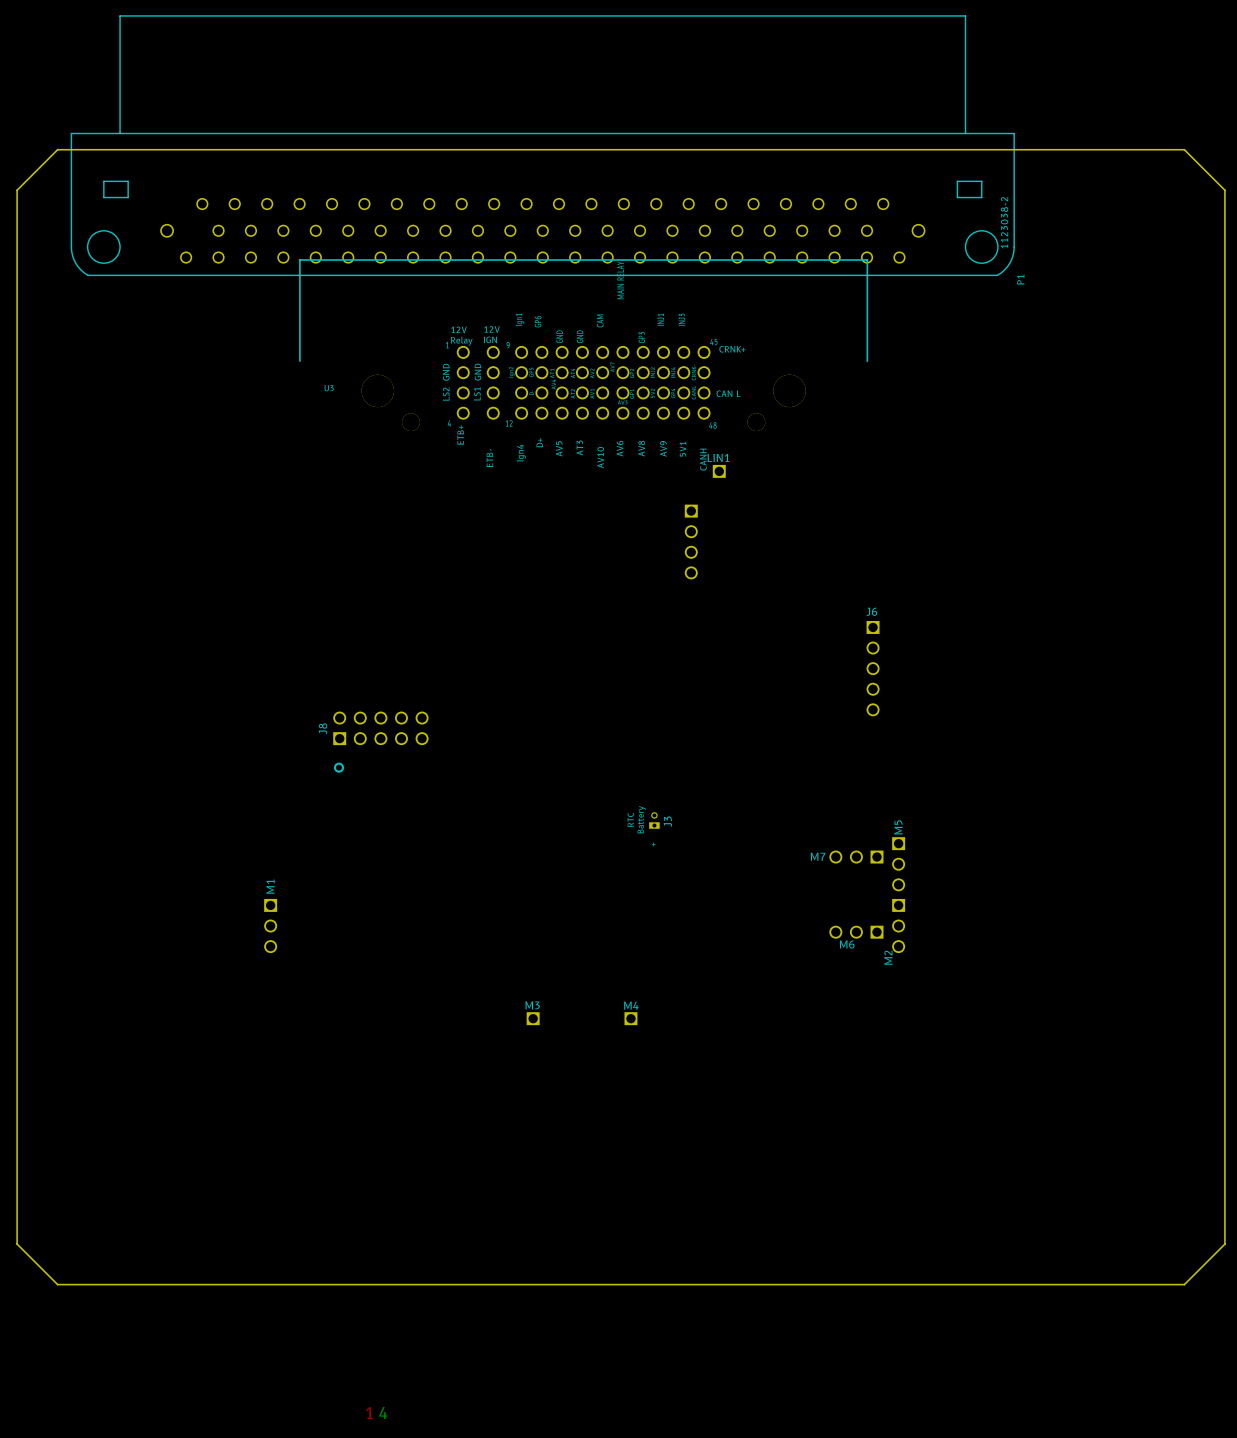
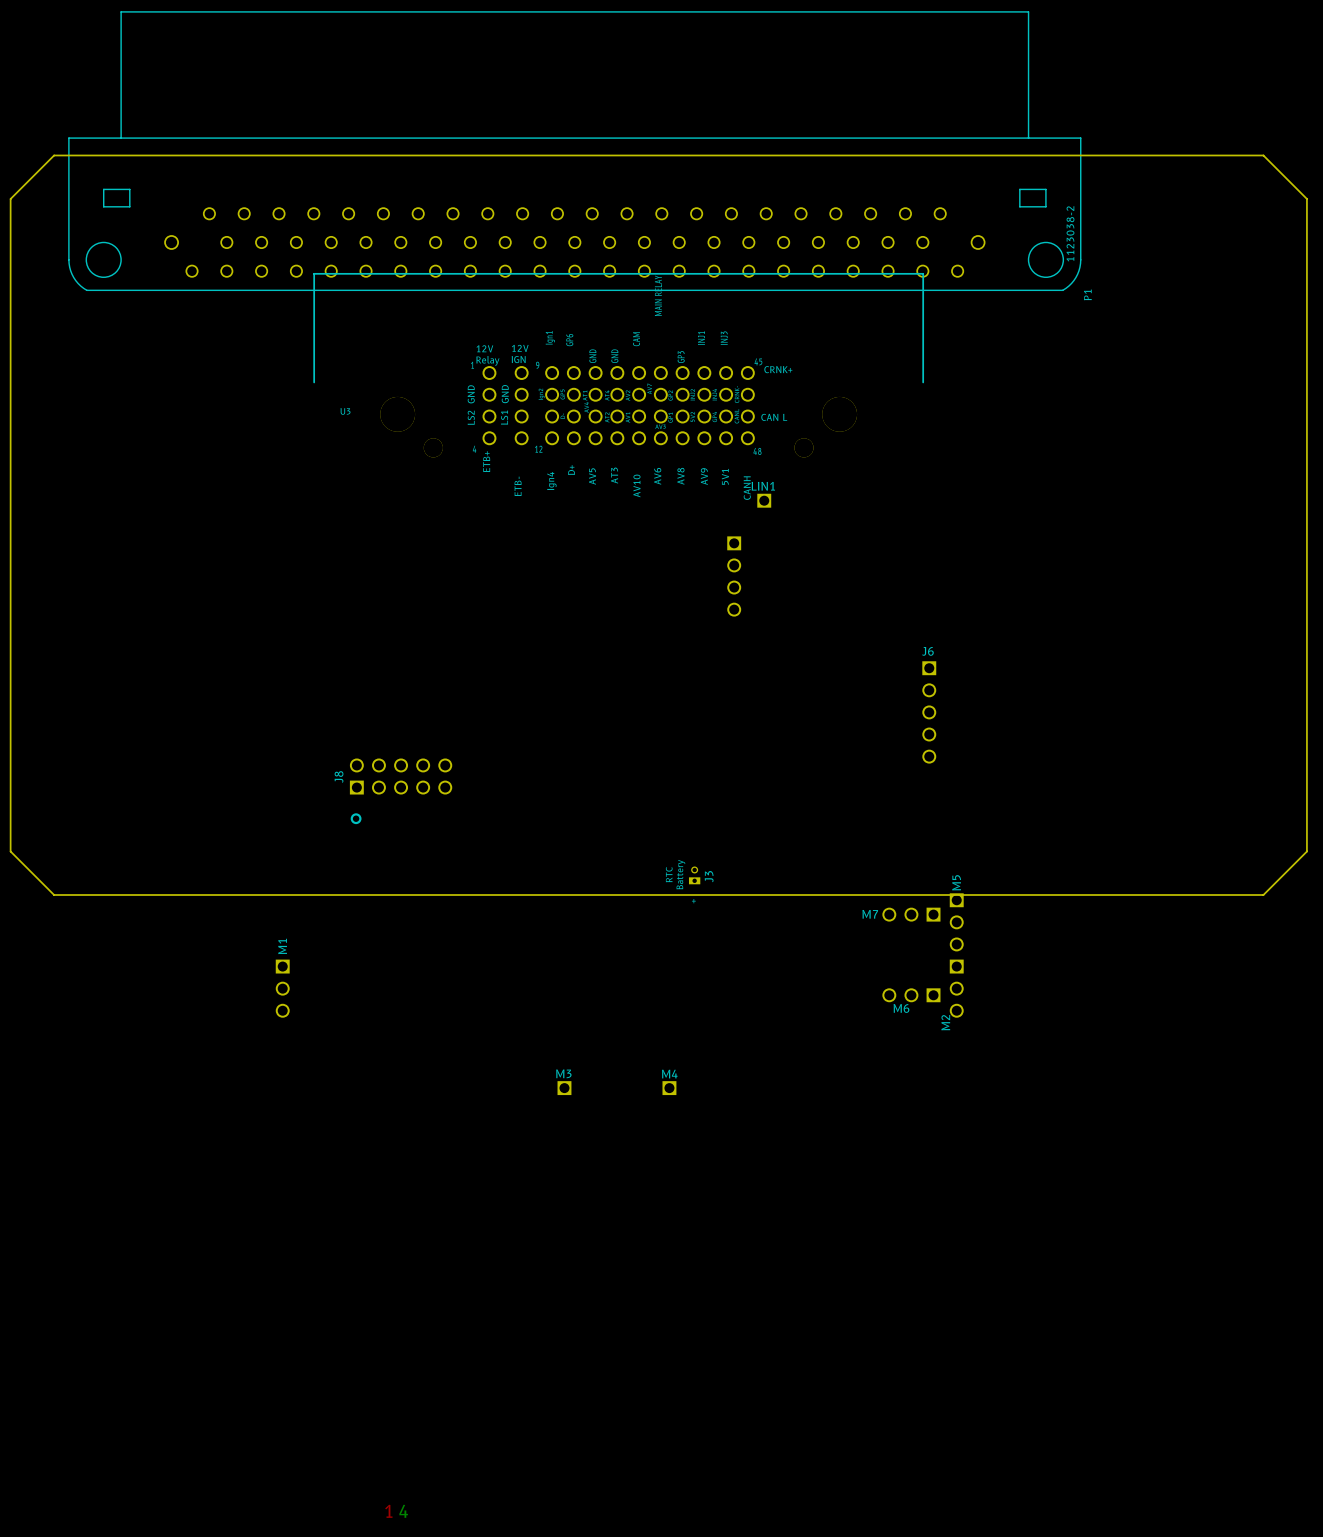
board edge: (17, 798) (17, 1244) (57, 1284) (1184, 1284) (1224, 1244) (1224, 798) -> (10, 851) (54, 895) (1263, 895) (1306, 851)

